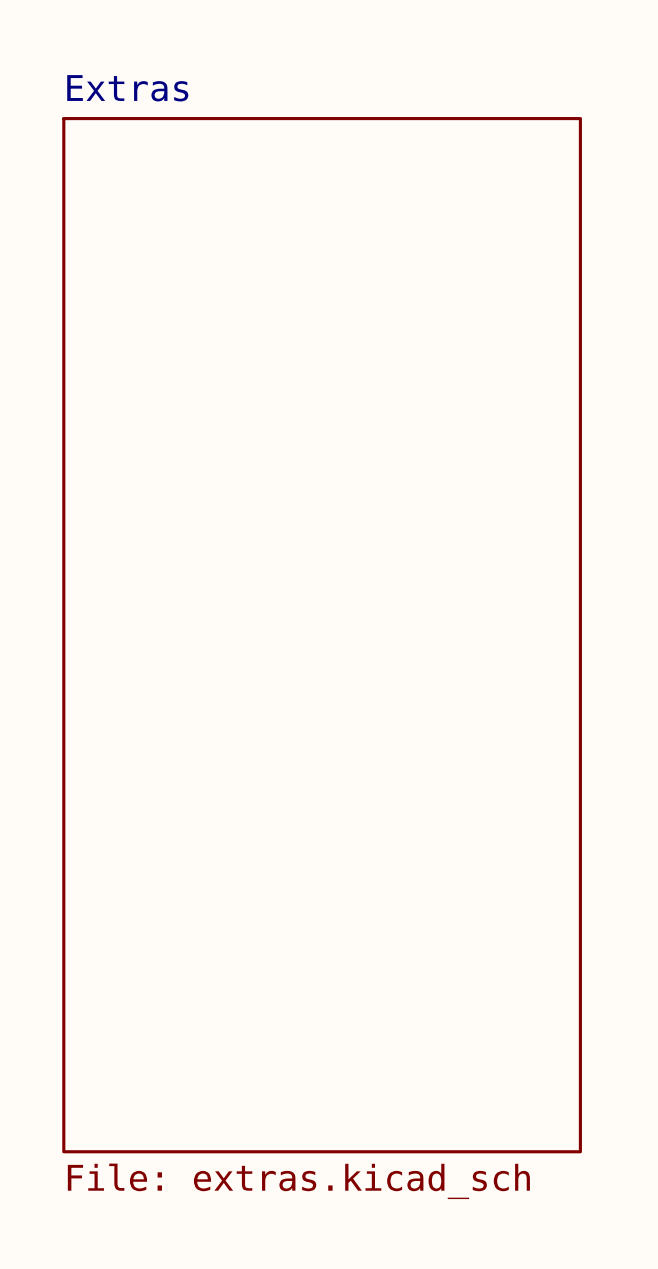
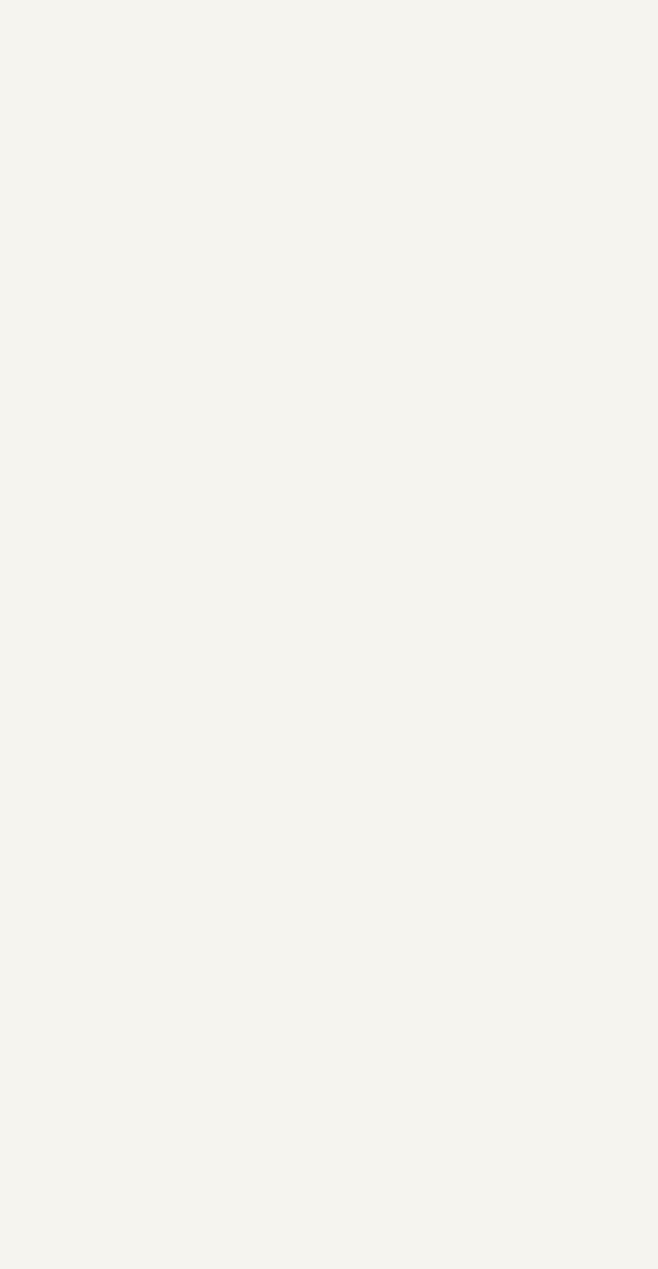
sheet Extras: File: extras.kicad_sch (322, 635) -> none

